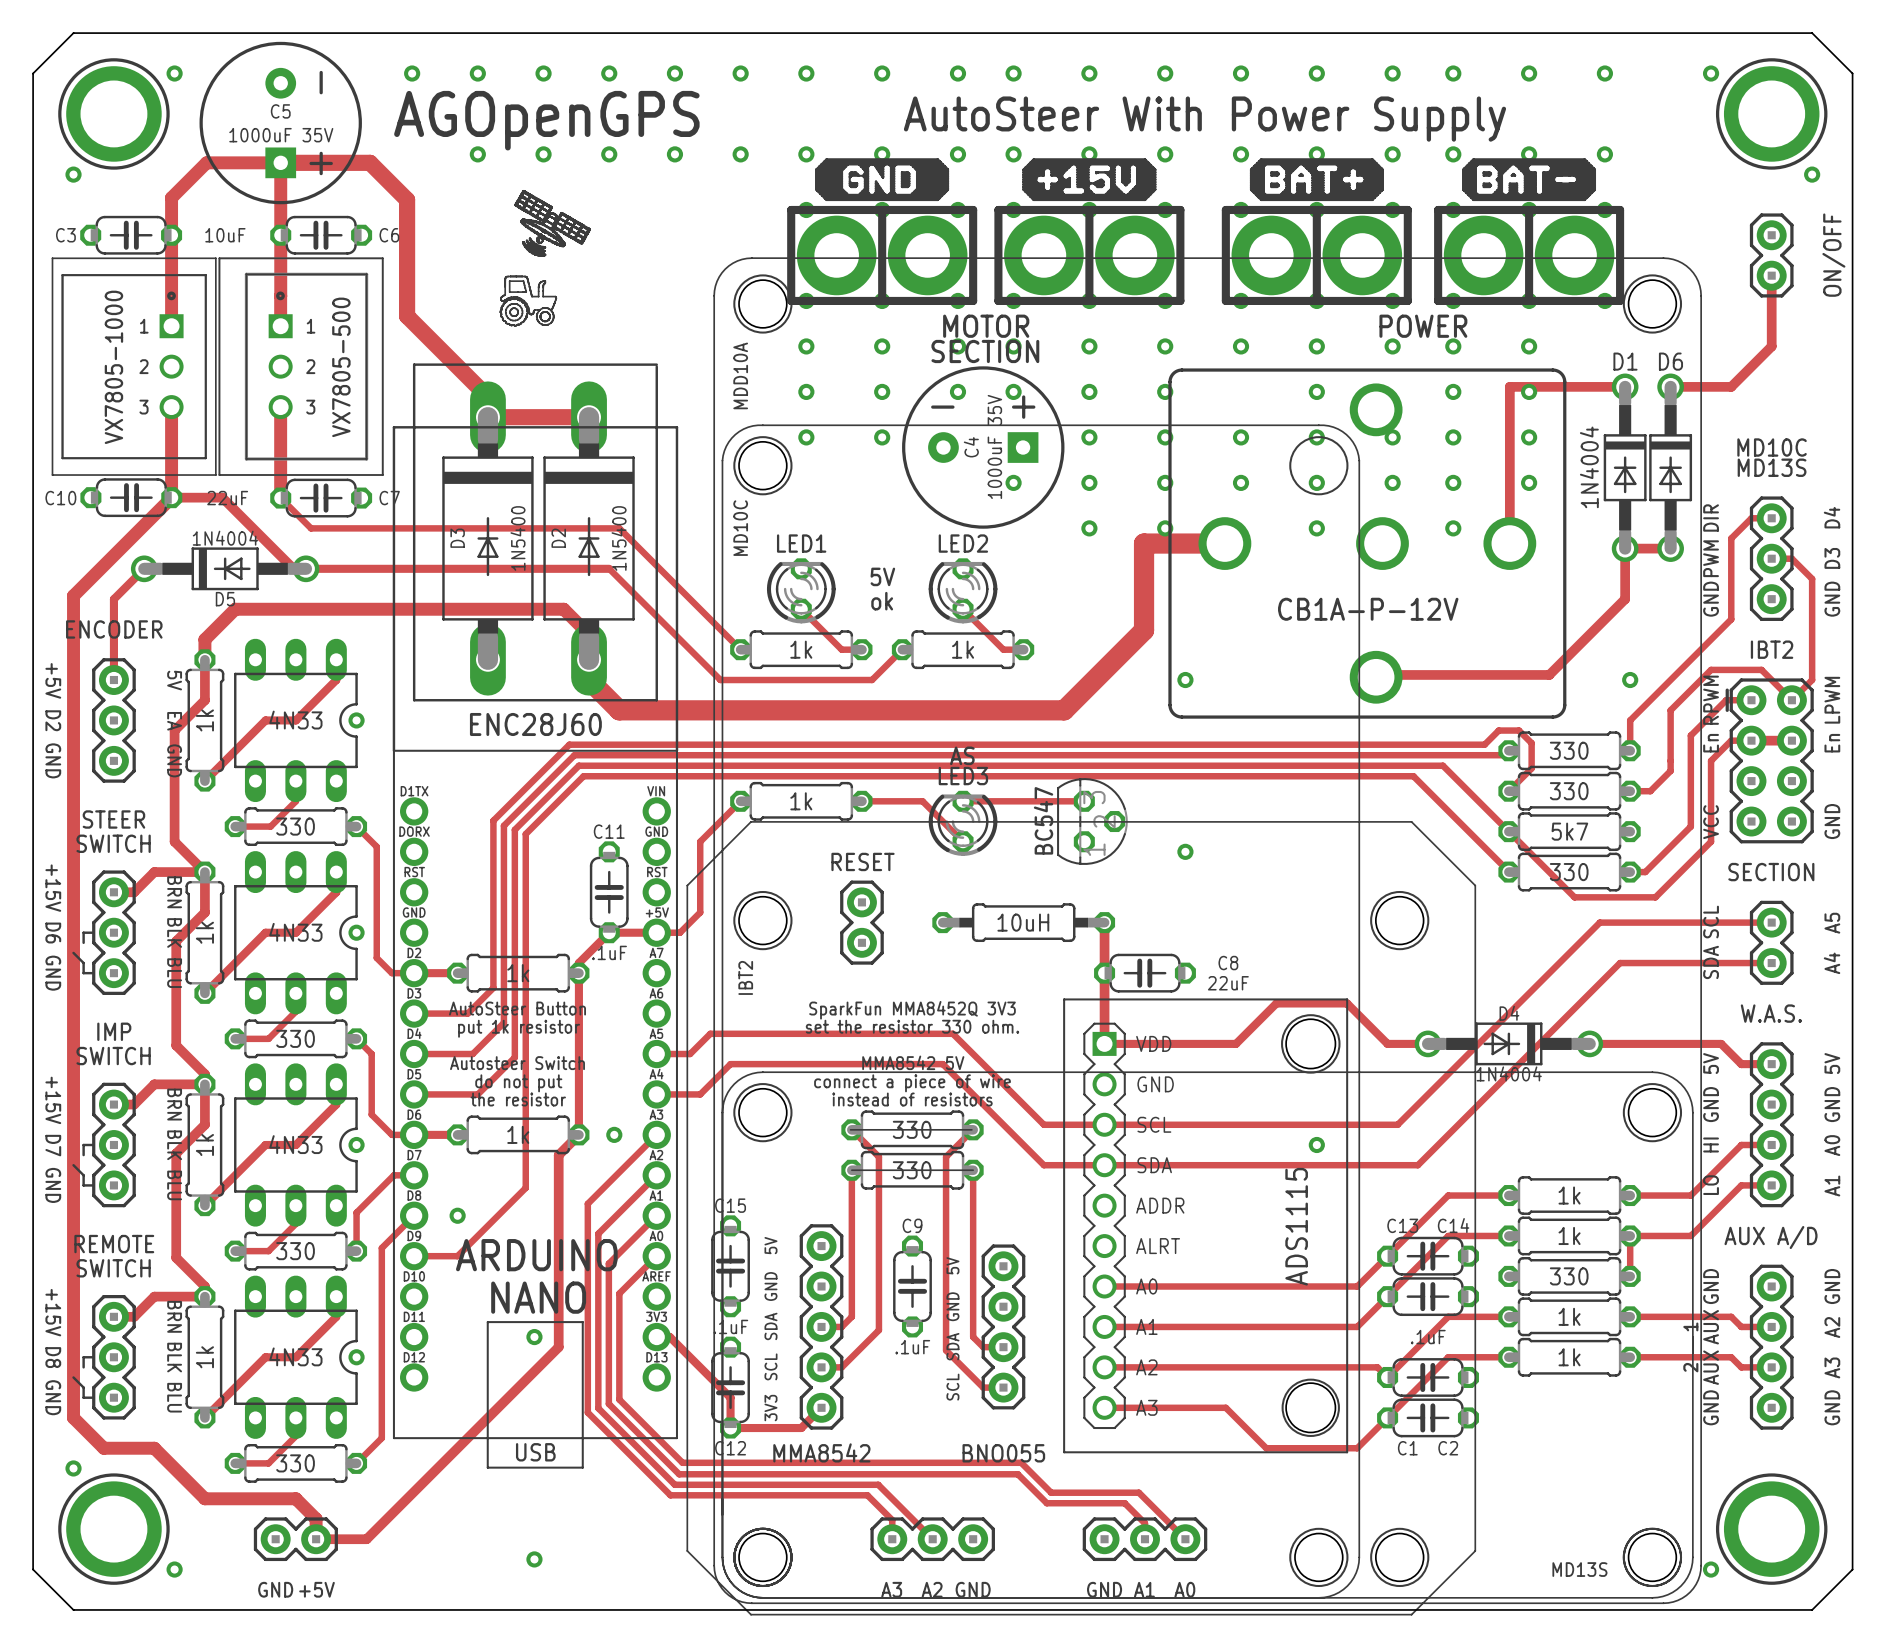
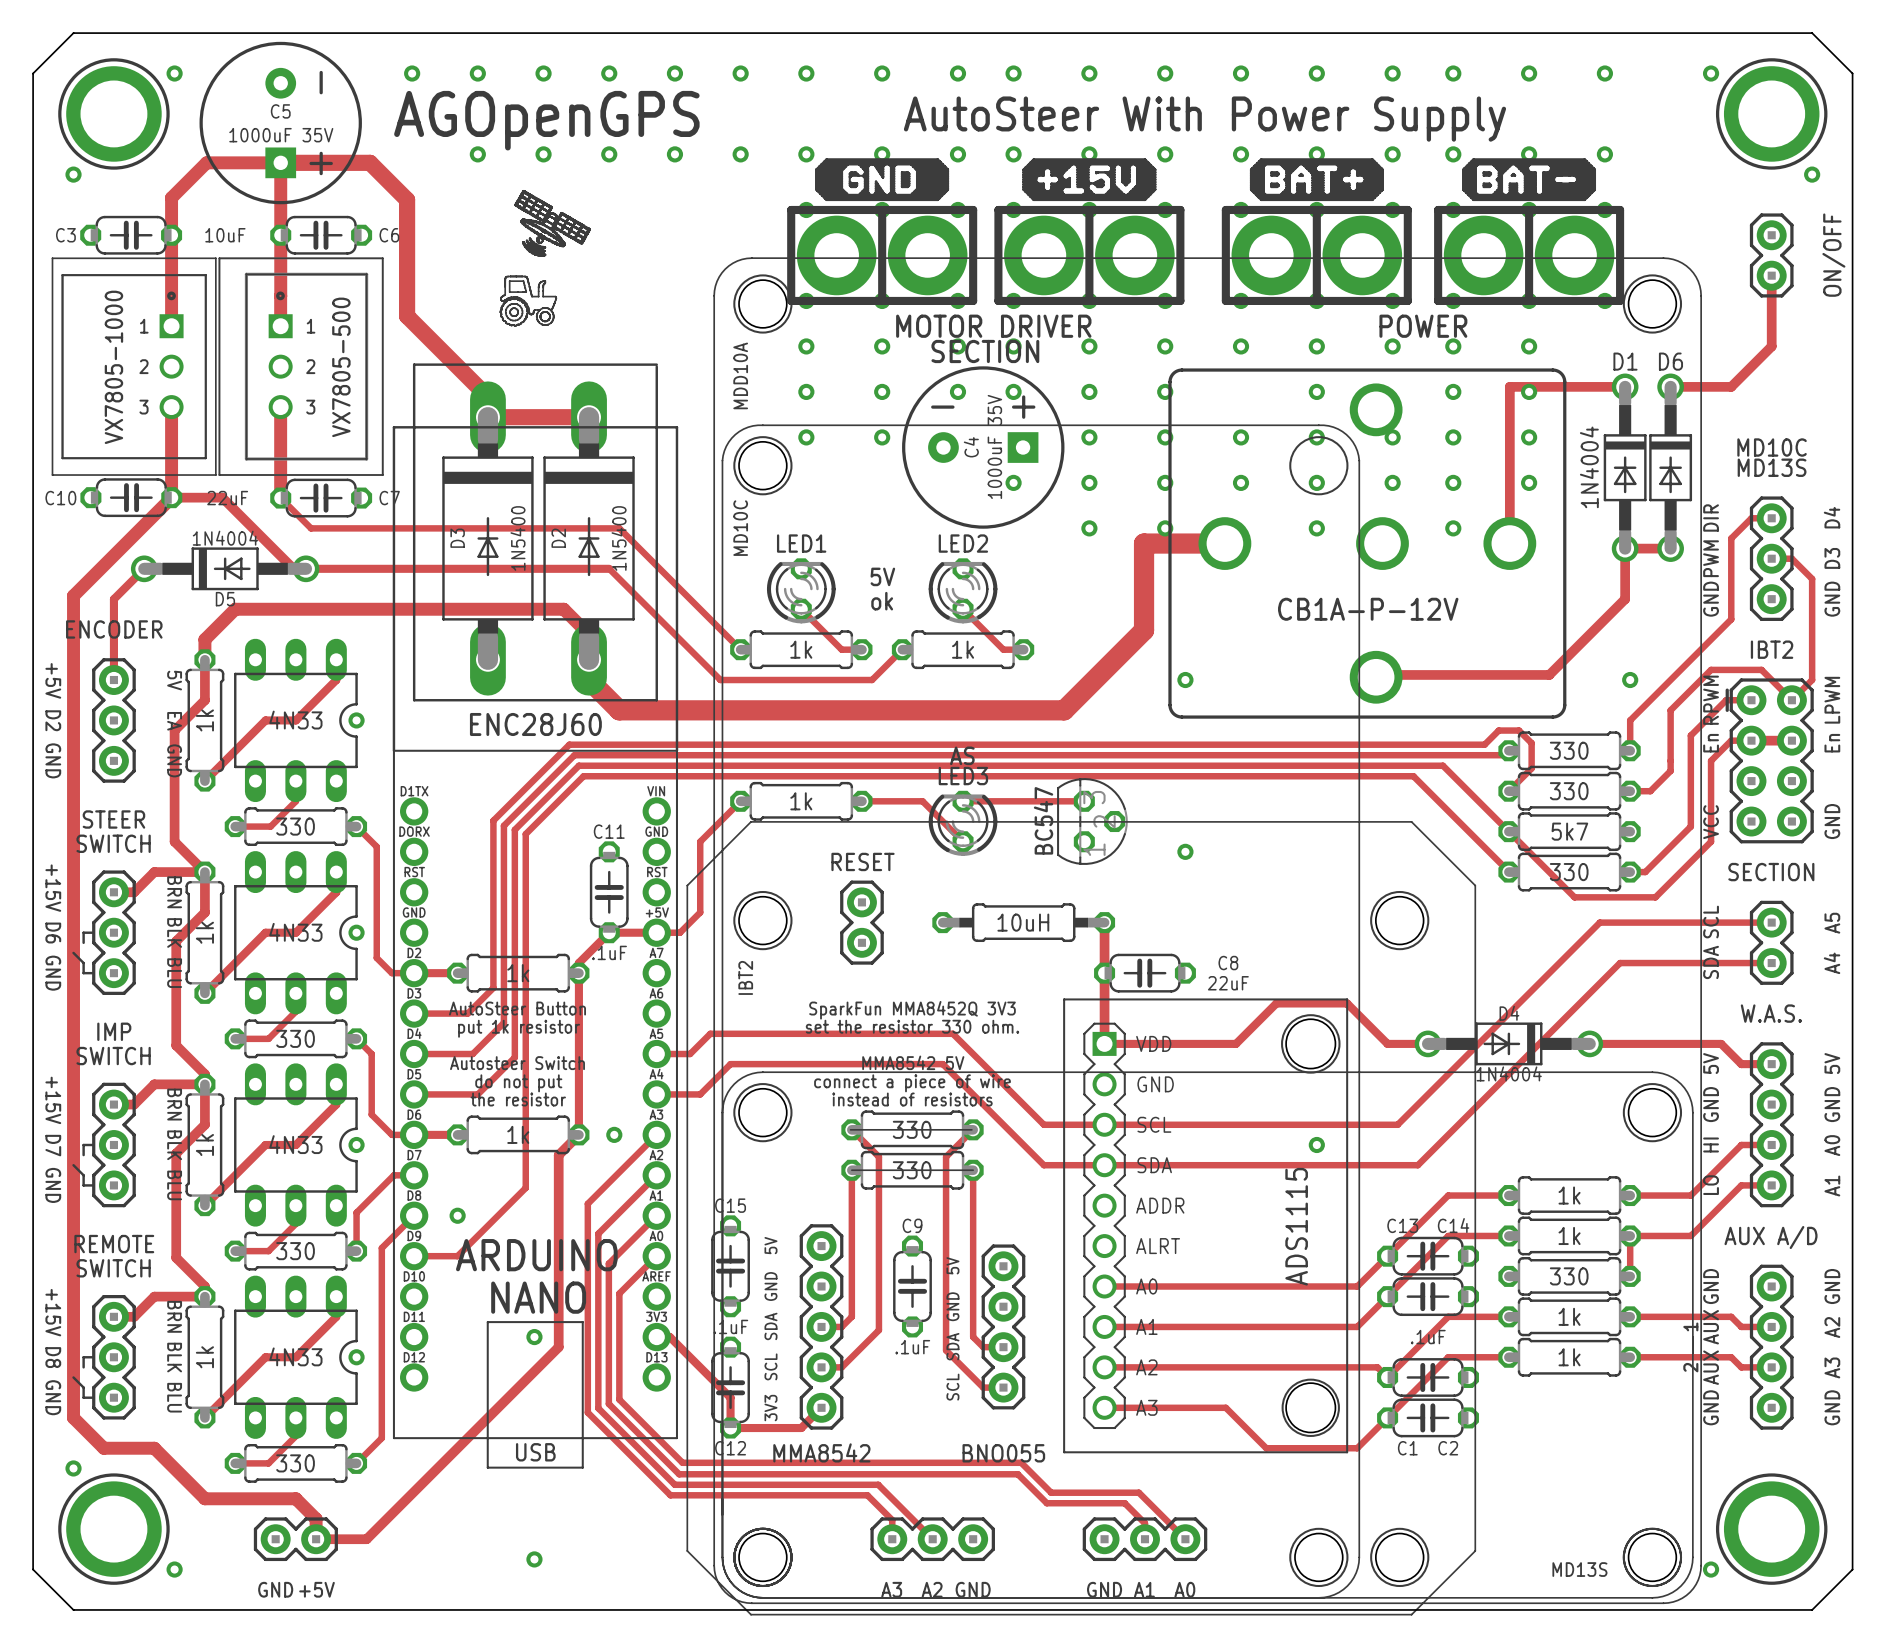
text: MOTOR (986, 326) -> MOTOR DRIVER (993, 326)

